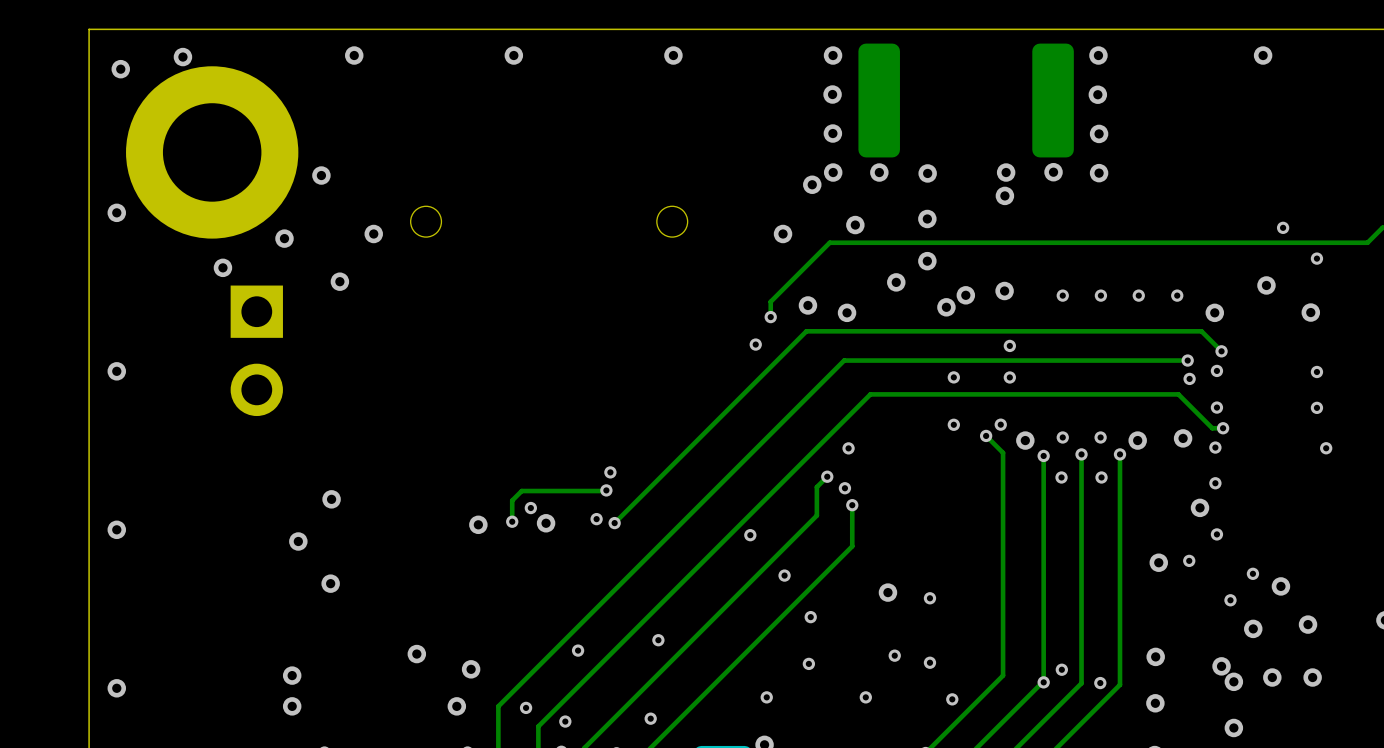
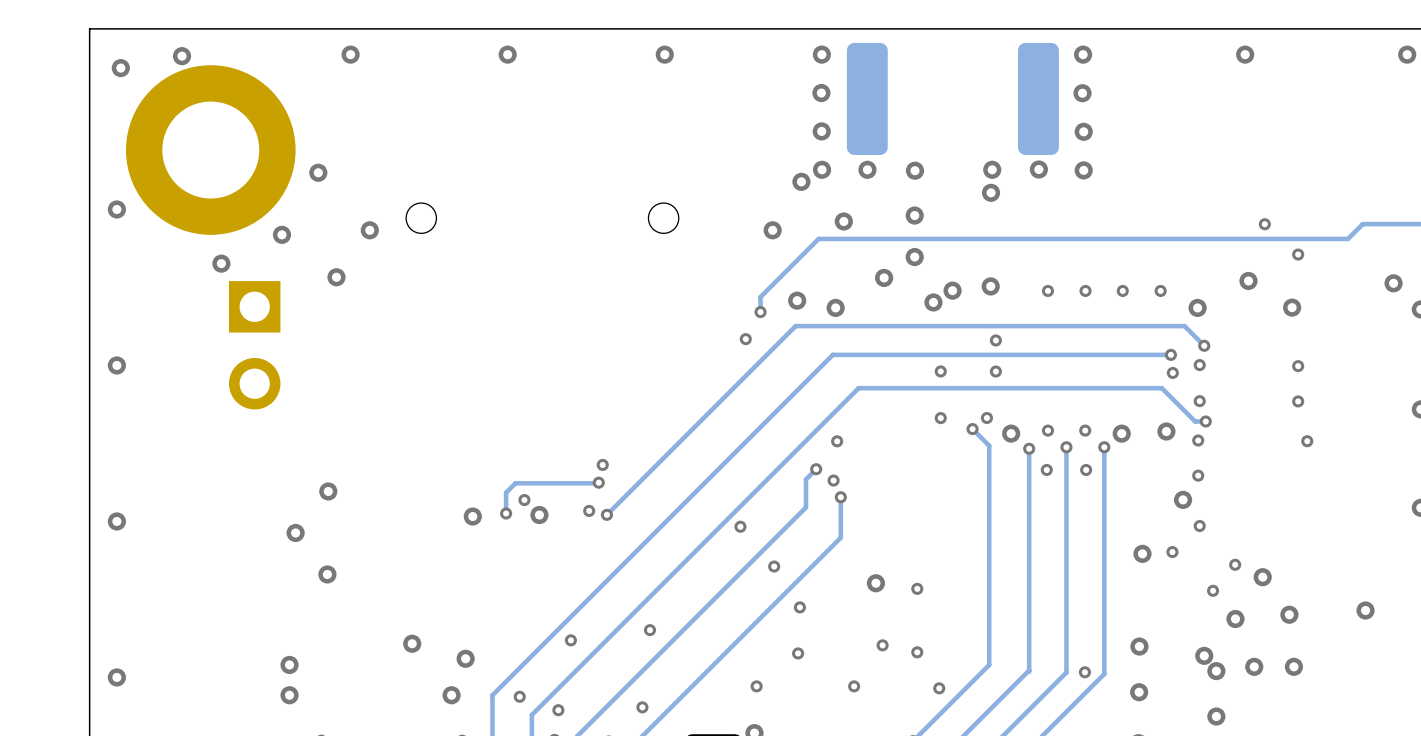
via: (1061, 669) -> none
via: (1043, 682) -> none

